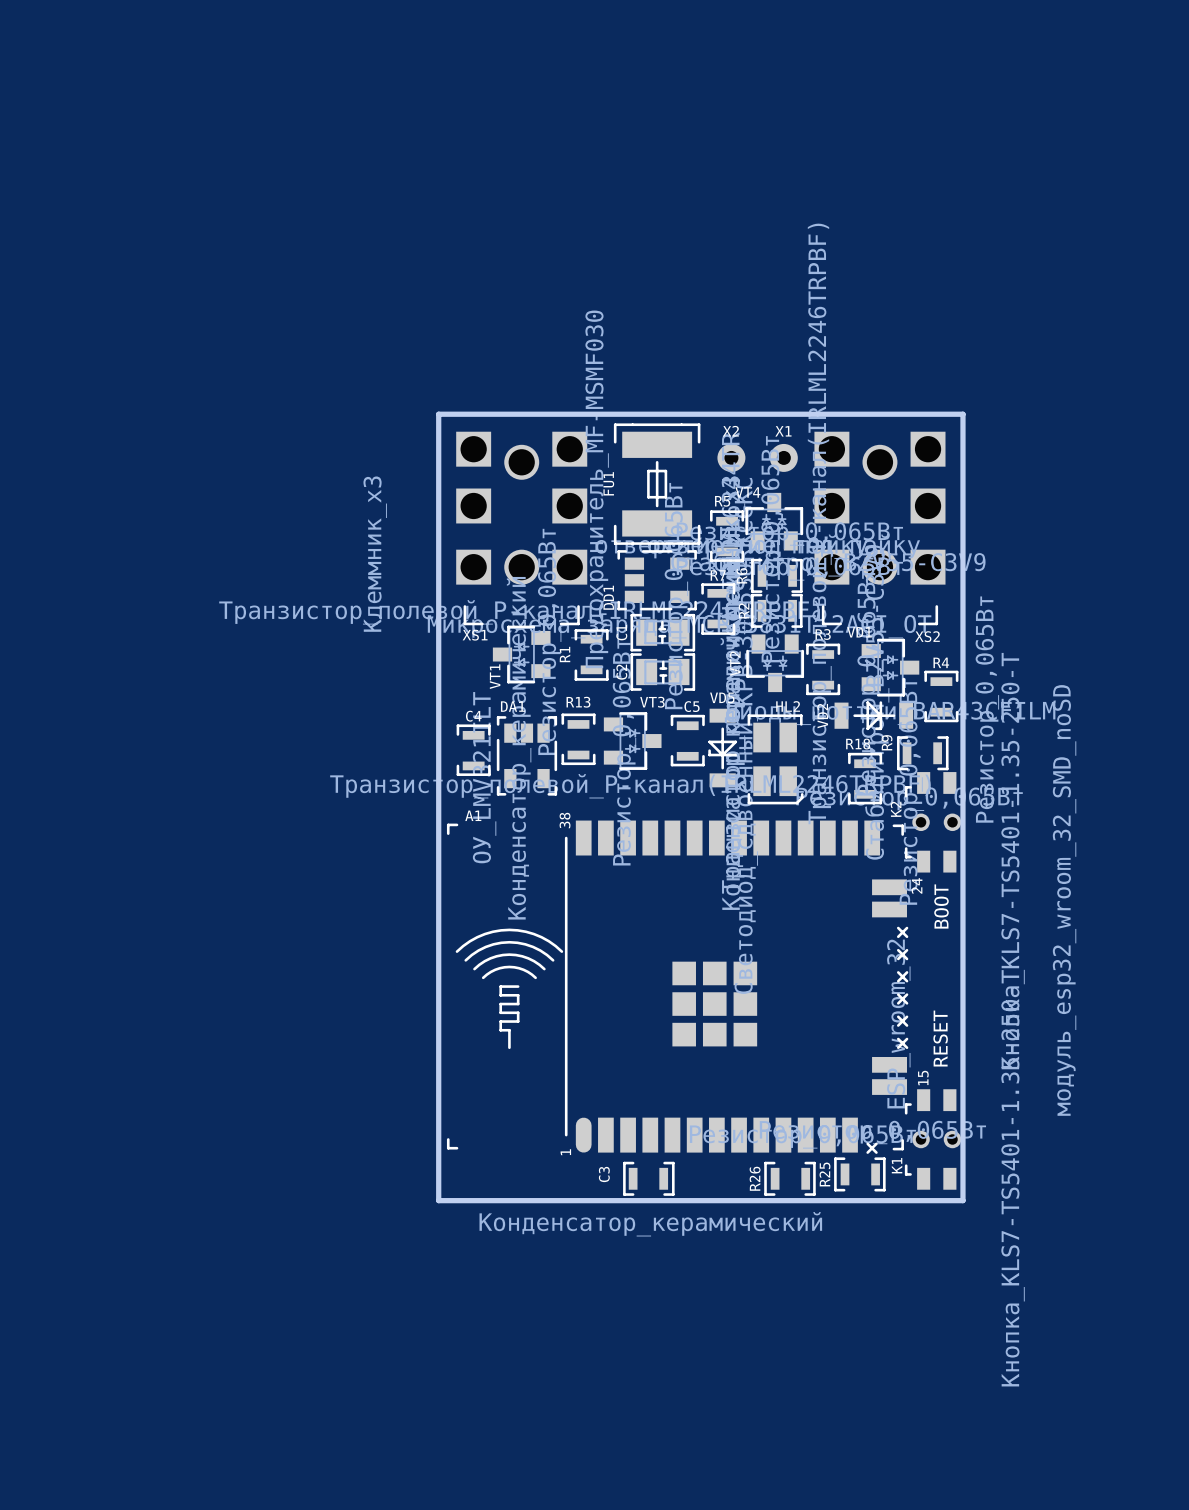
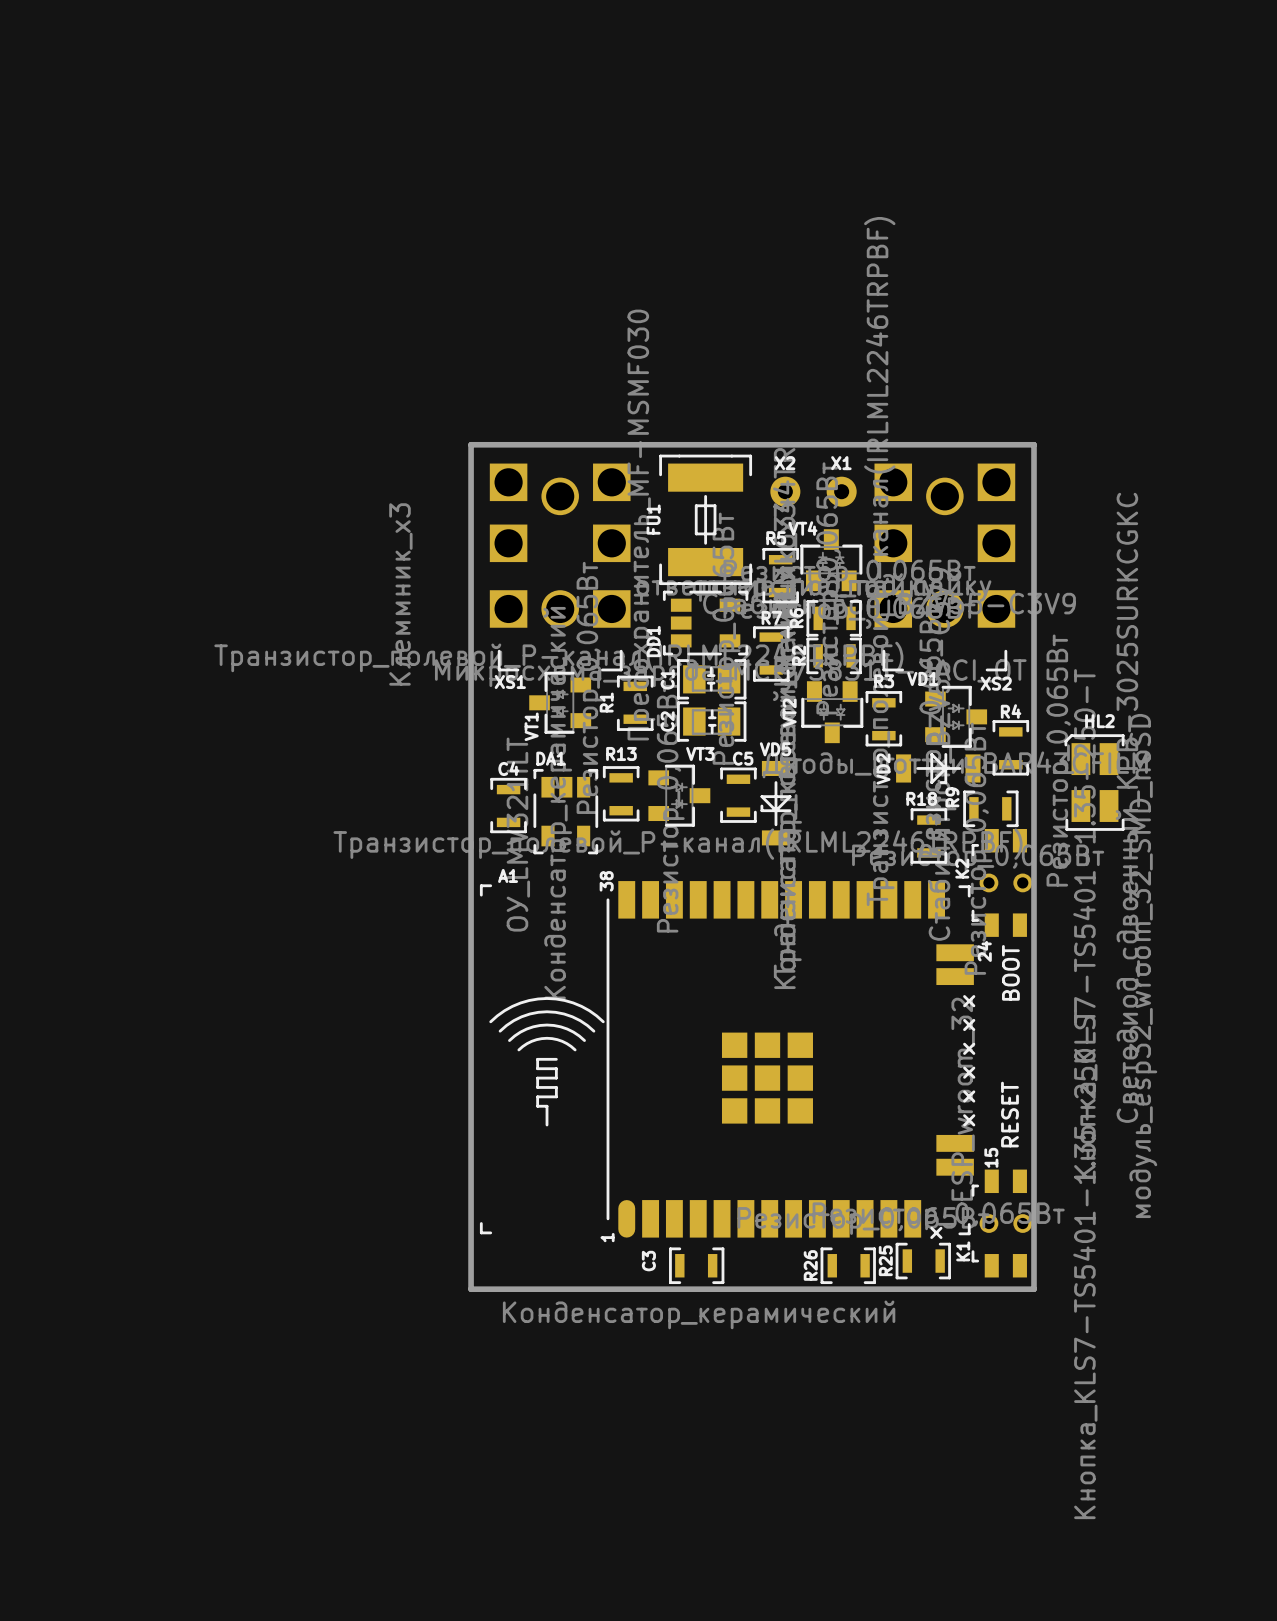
HL2 rotation: 0° (775, 759) -> 180° (1094, 782)
HL2 position: (775, 759) -> (1094, 782)

